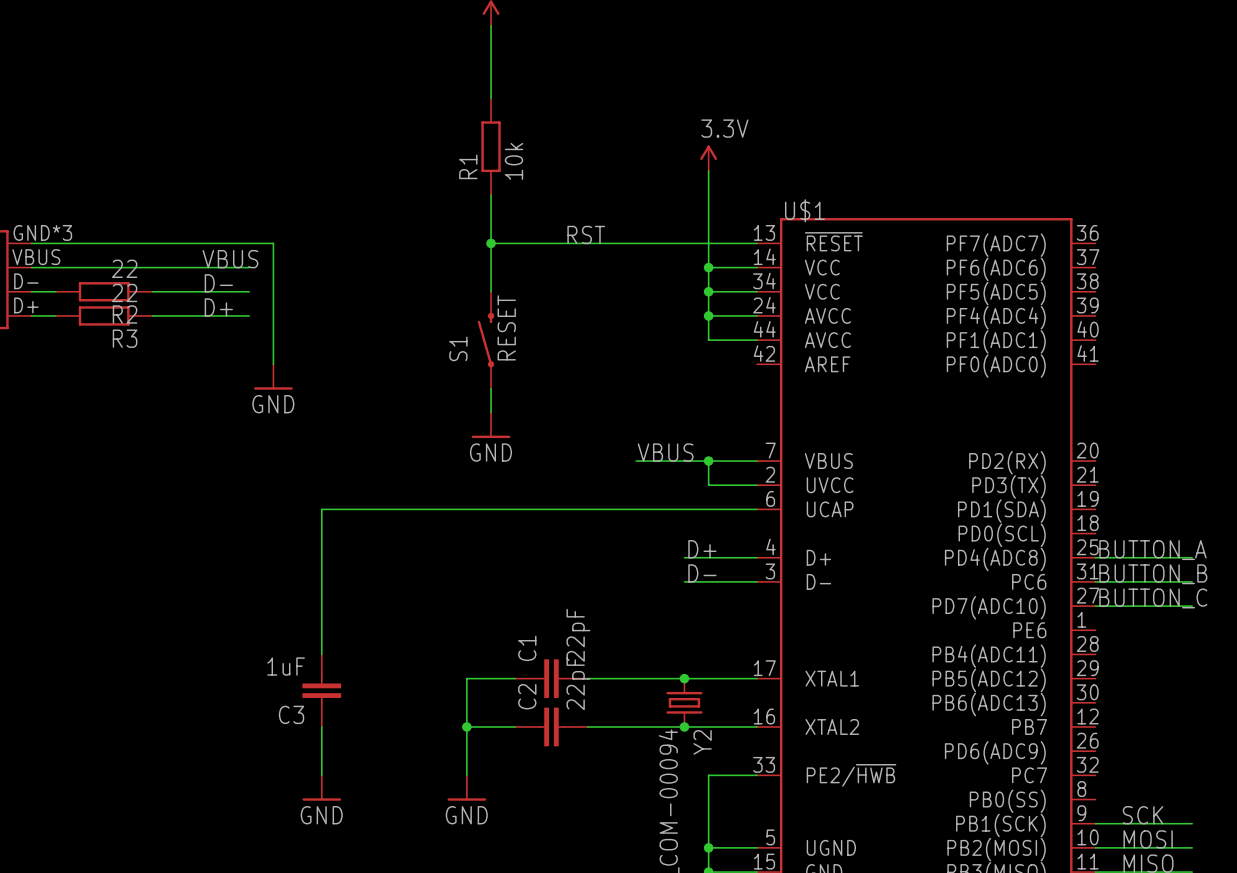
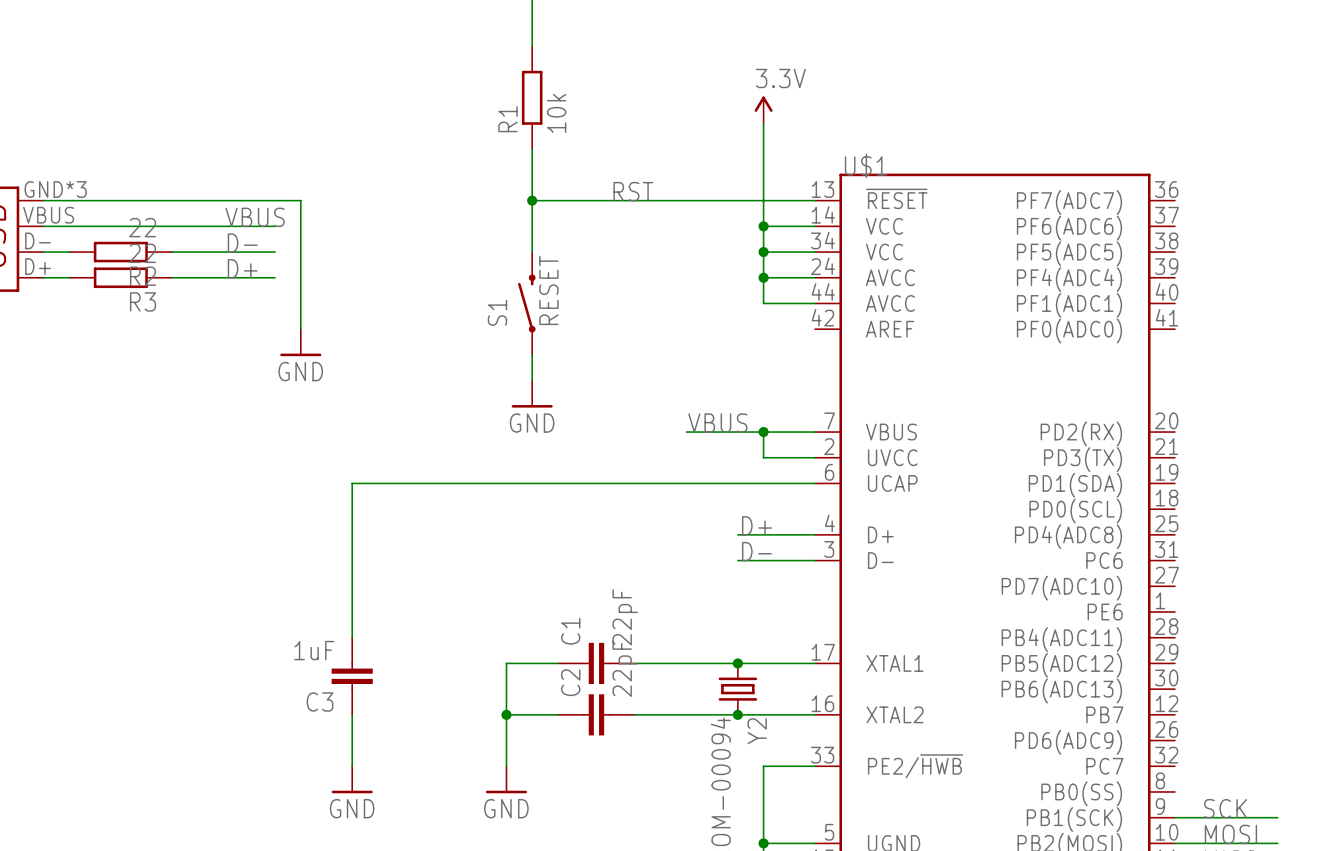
label: BUTTON_A (1152, 550) -> none
wire: (1095, 557) (1192, 557) -> none
label: BUTTON_B (1153, 574) -> none
wire: (1095, 581) (1192, 581) -> none
label: BUTTON_C (1153, 598) -> none
wire: (1095, 606) (1192, 606) -> none

